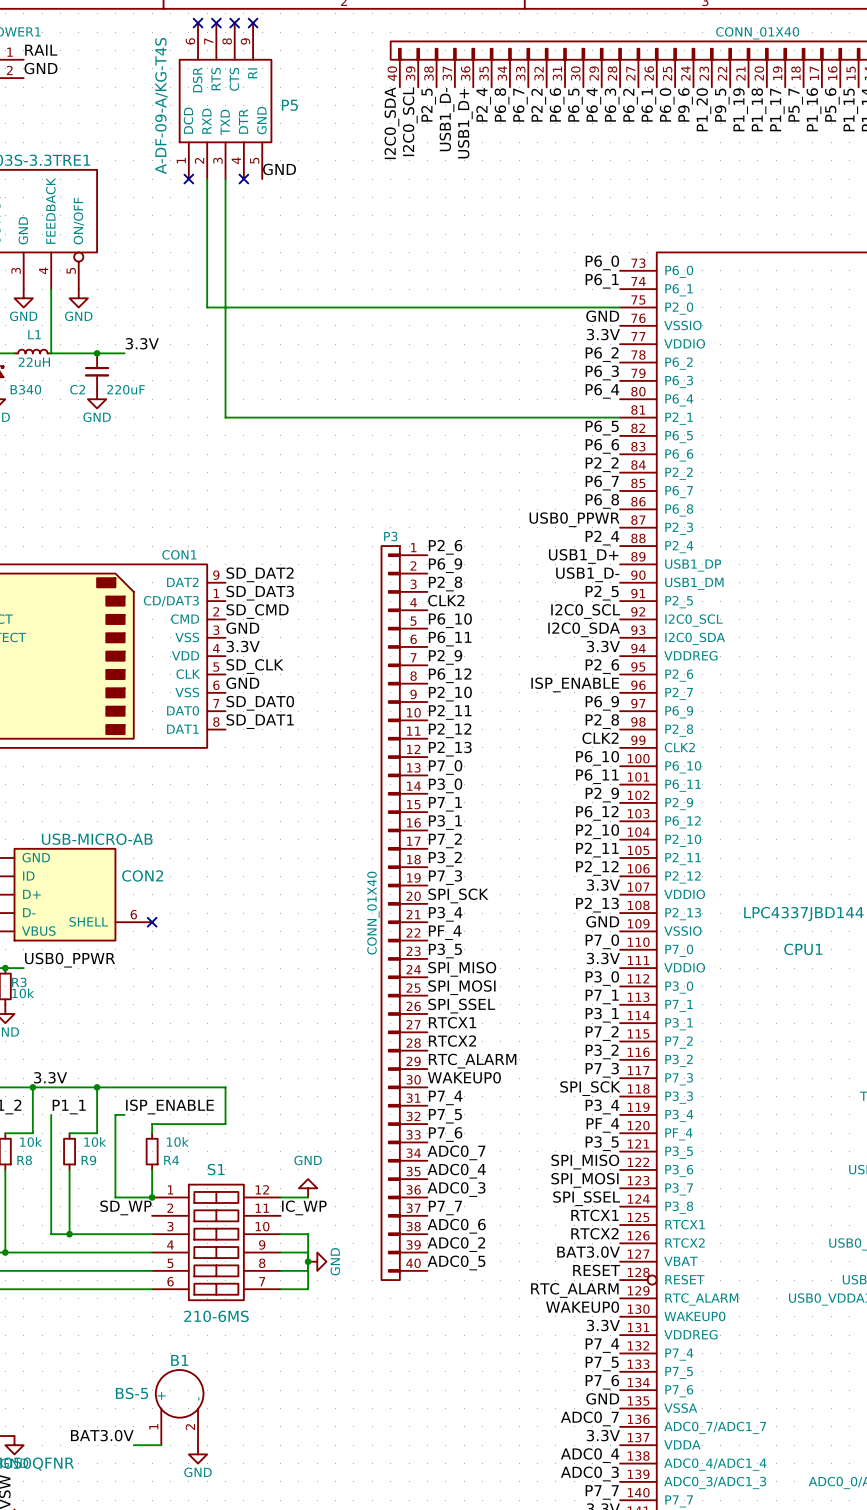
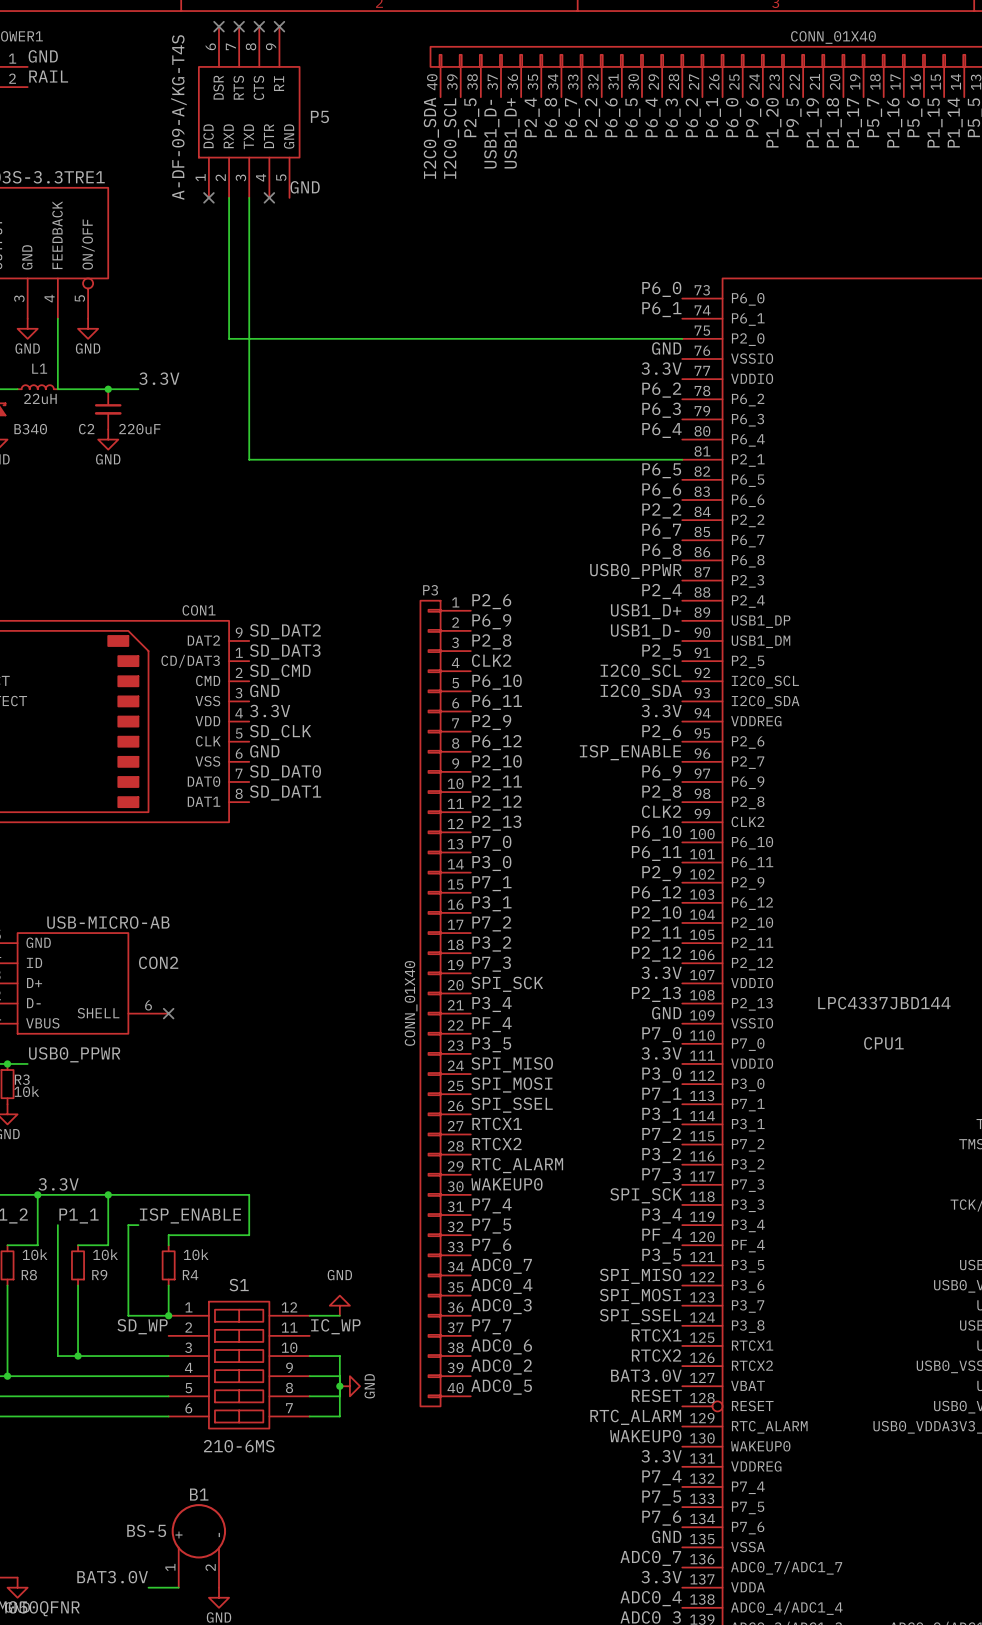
label: RAIL (41, 50) -> GND (43, 56)
label: GND (40, 68) -> RAIL (48, 76)

